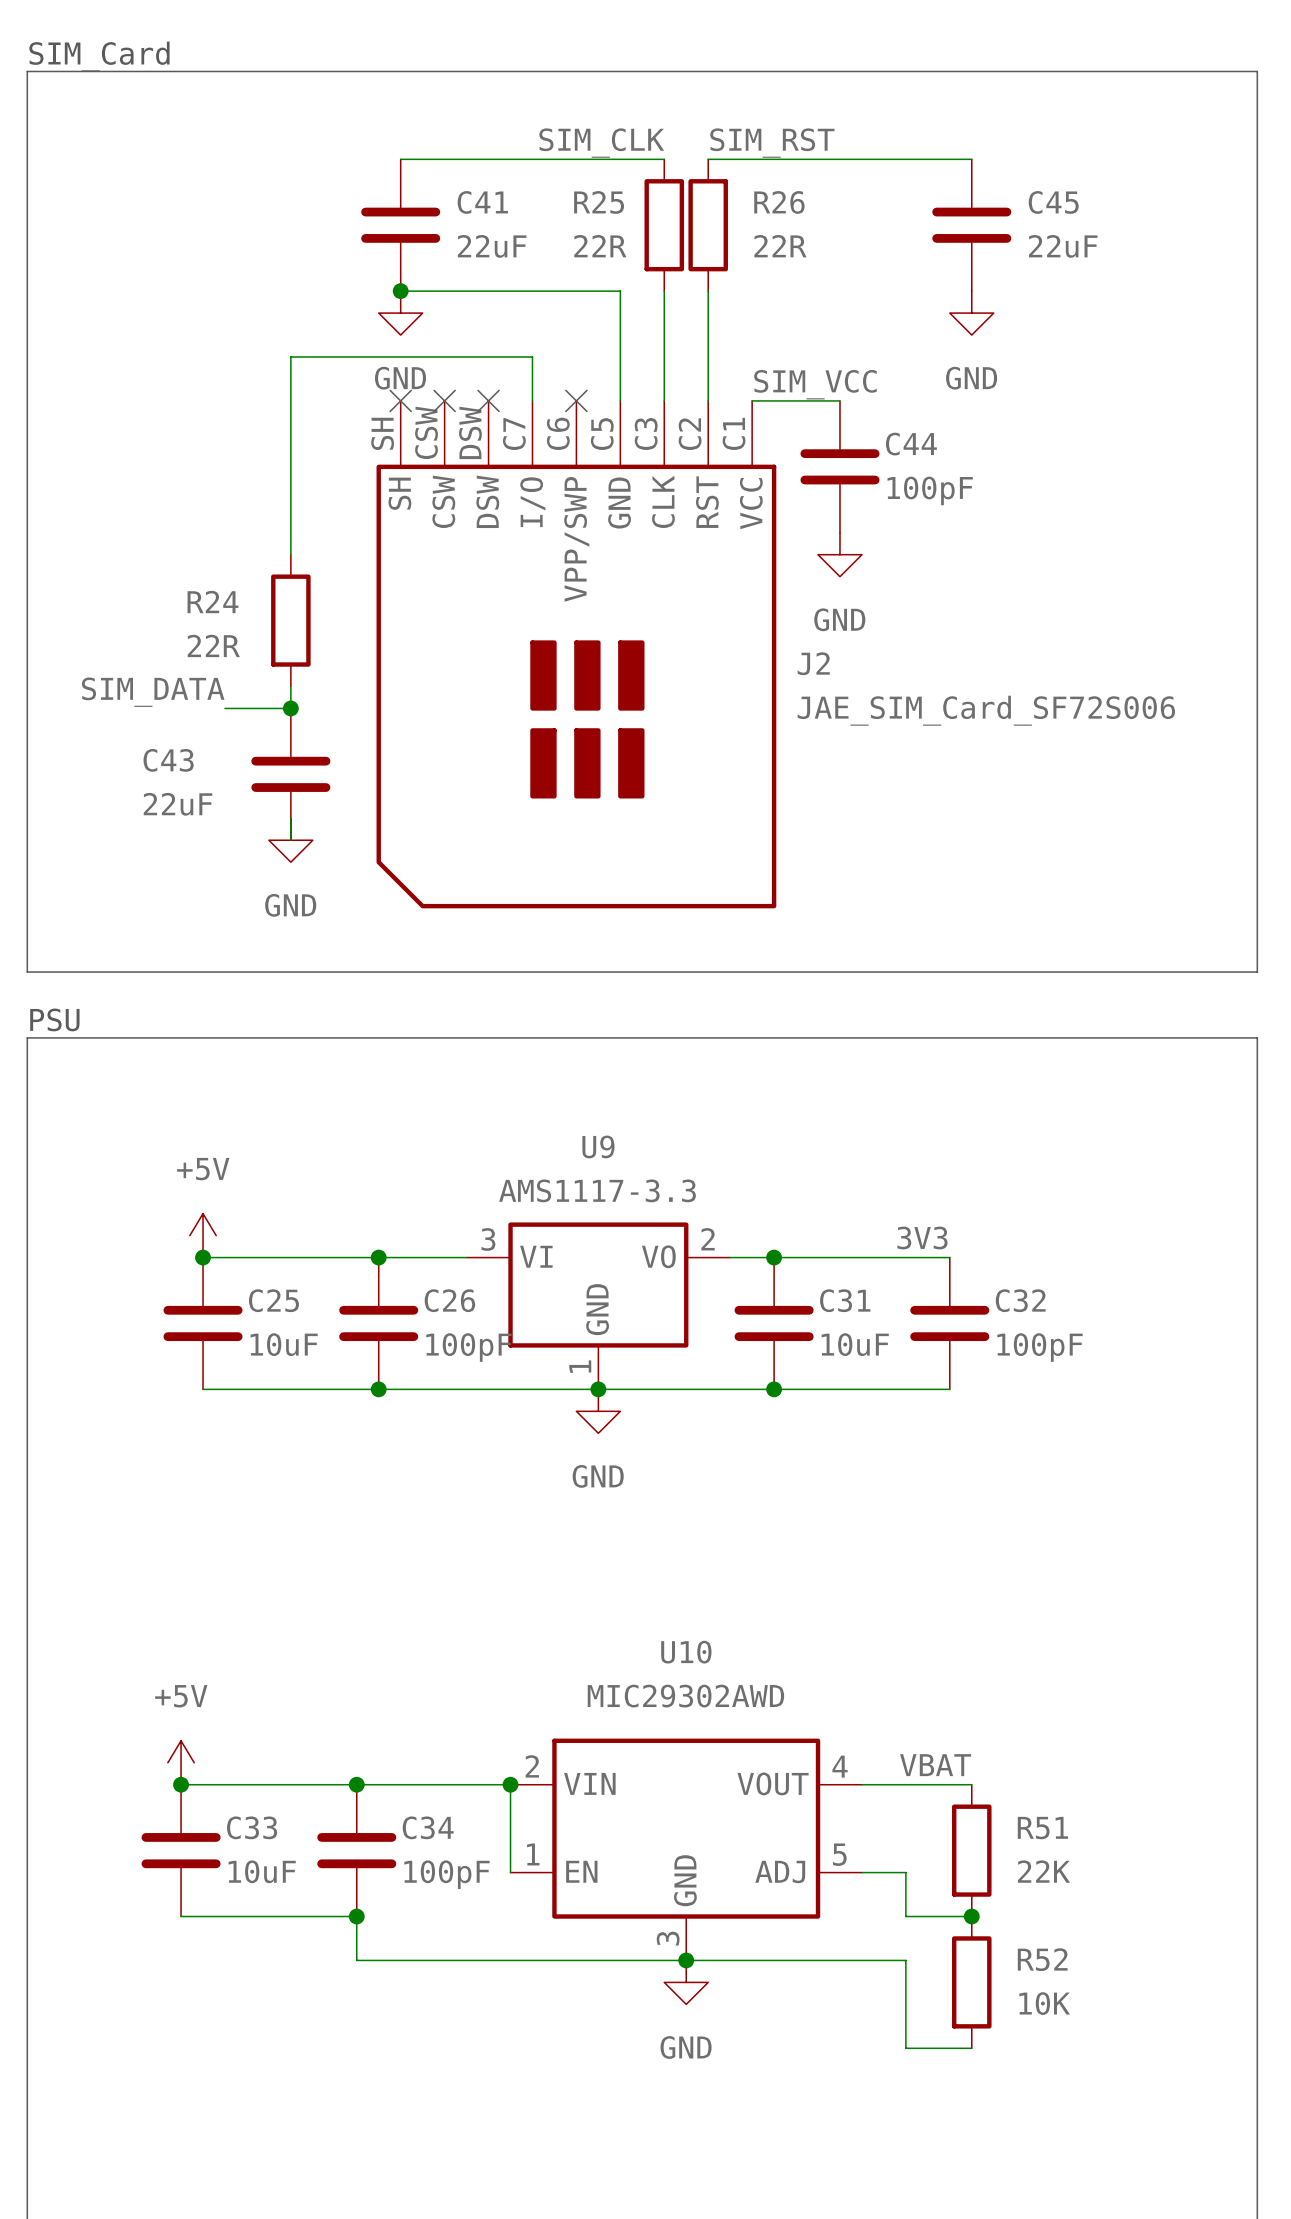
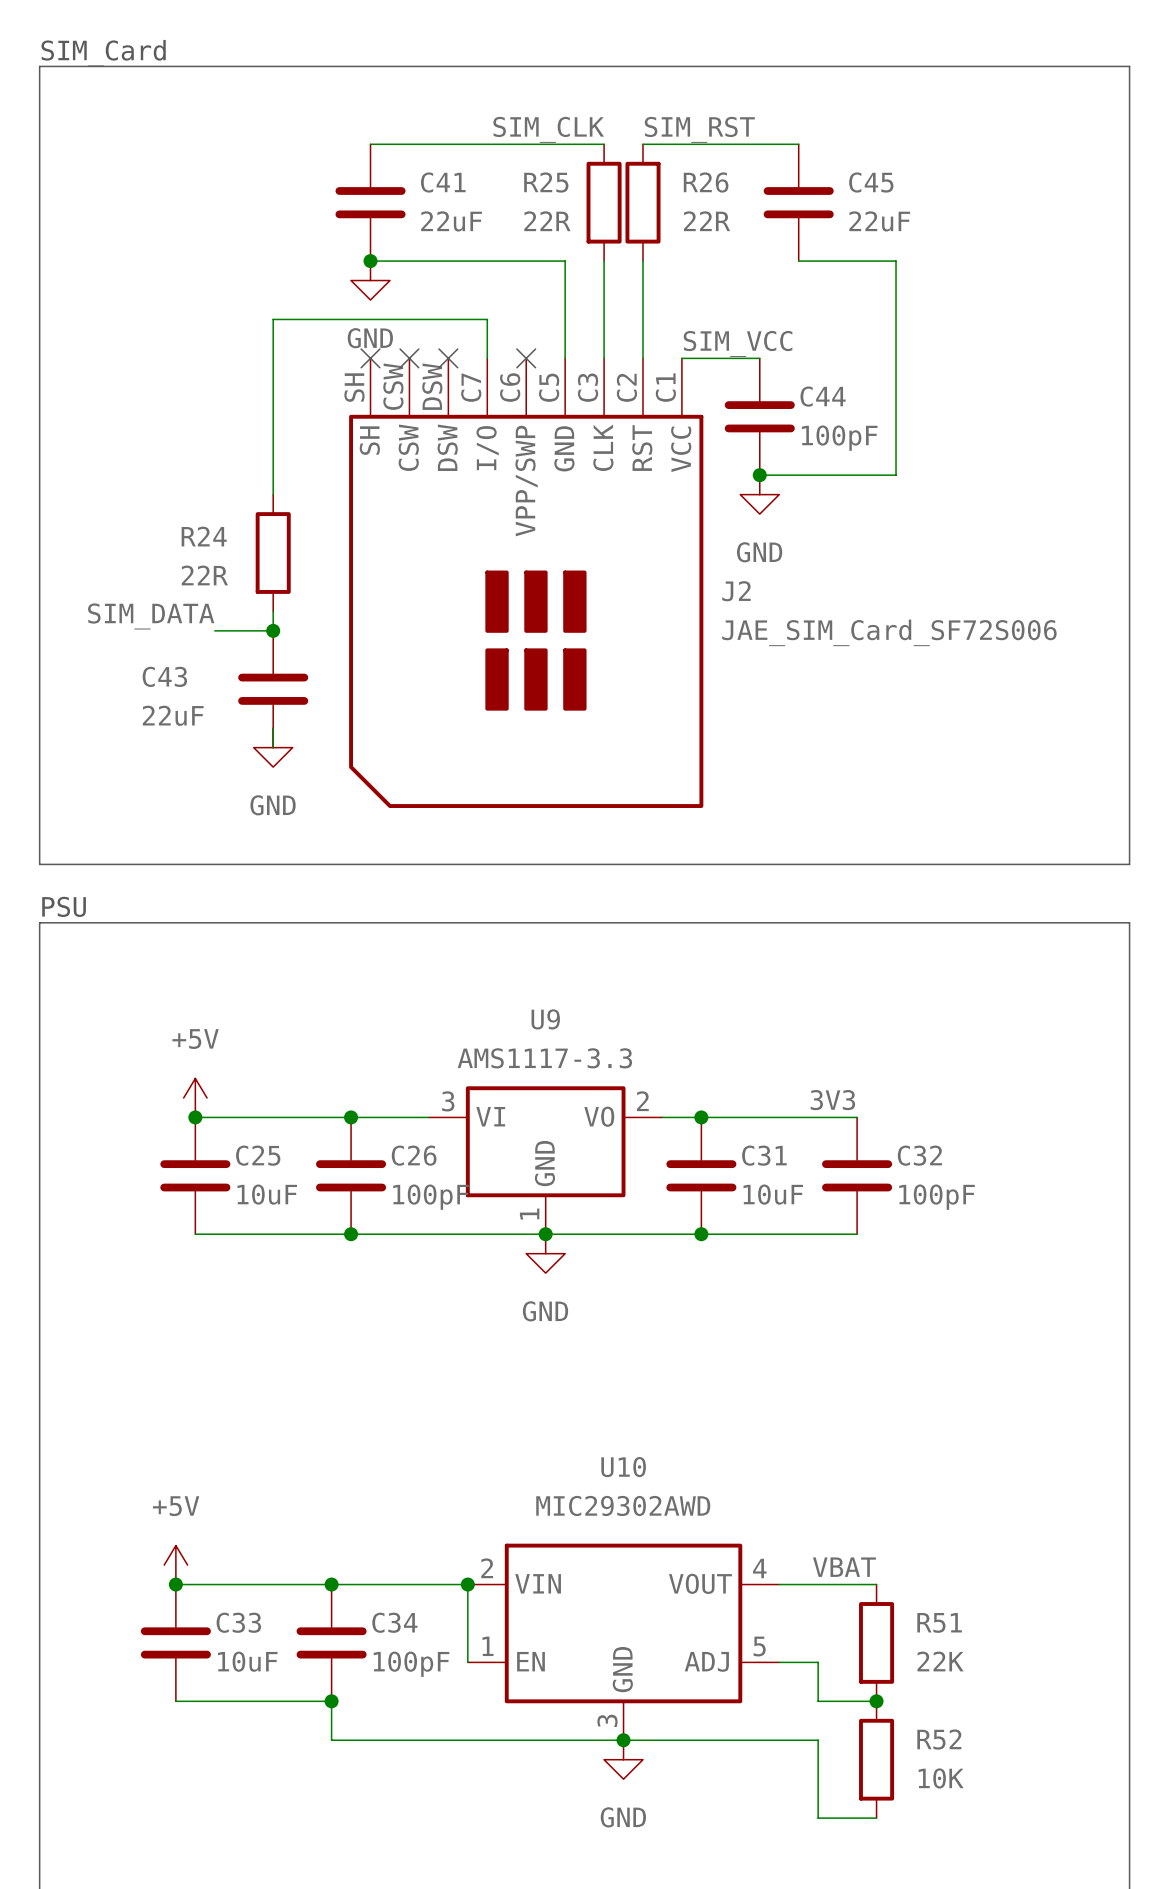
wire: (883, 159) (971, 159) -> none
C45 position: (971, 225) -> (798, 202)
wire: none -> (798, 261) (896, 261) (896, 475) (759, 475)
power symbol: GND (971, 313) -> none
junction: none -> (759, 475)

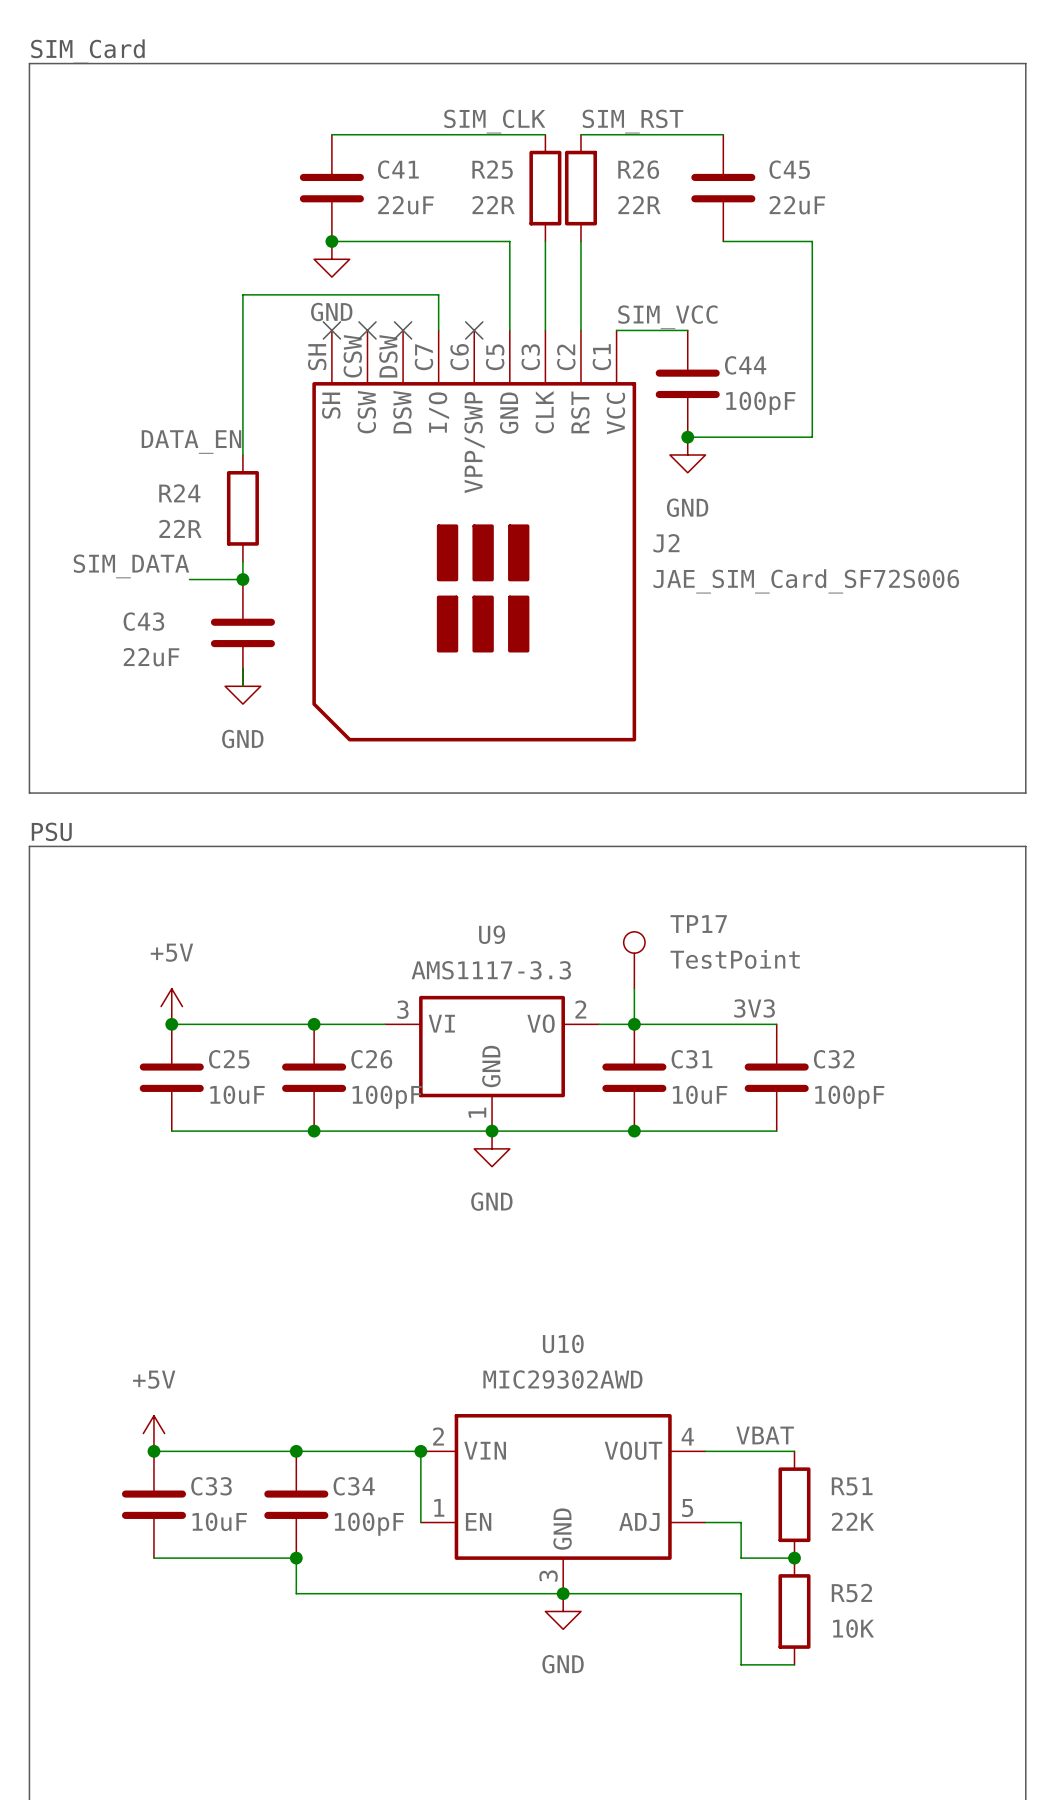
label: none -> DATA_EN (191, 441)
TP17: none -> TestPoint (634, 960)
wire: none -> (634, 988) (634, 1024)

